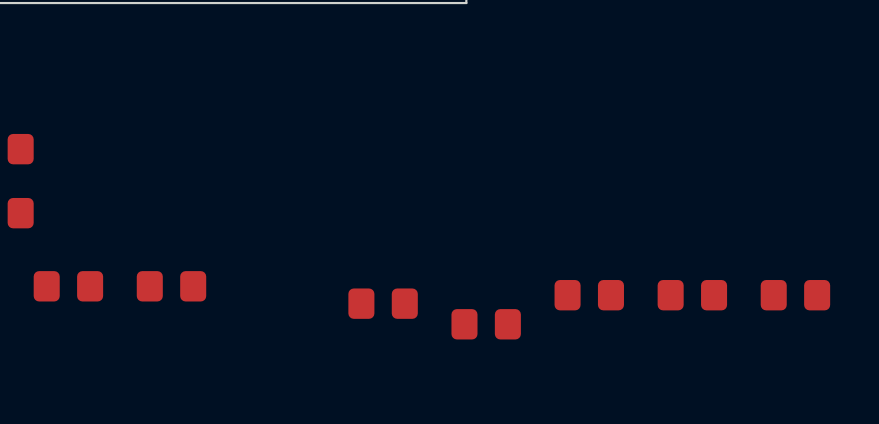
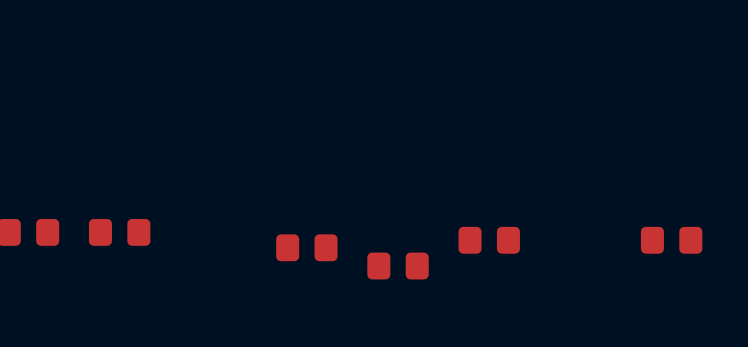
part: (692, 295) -> none

